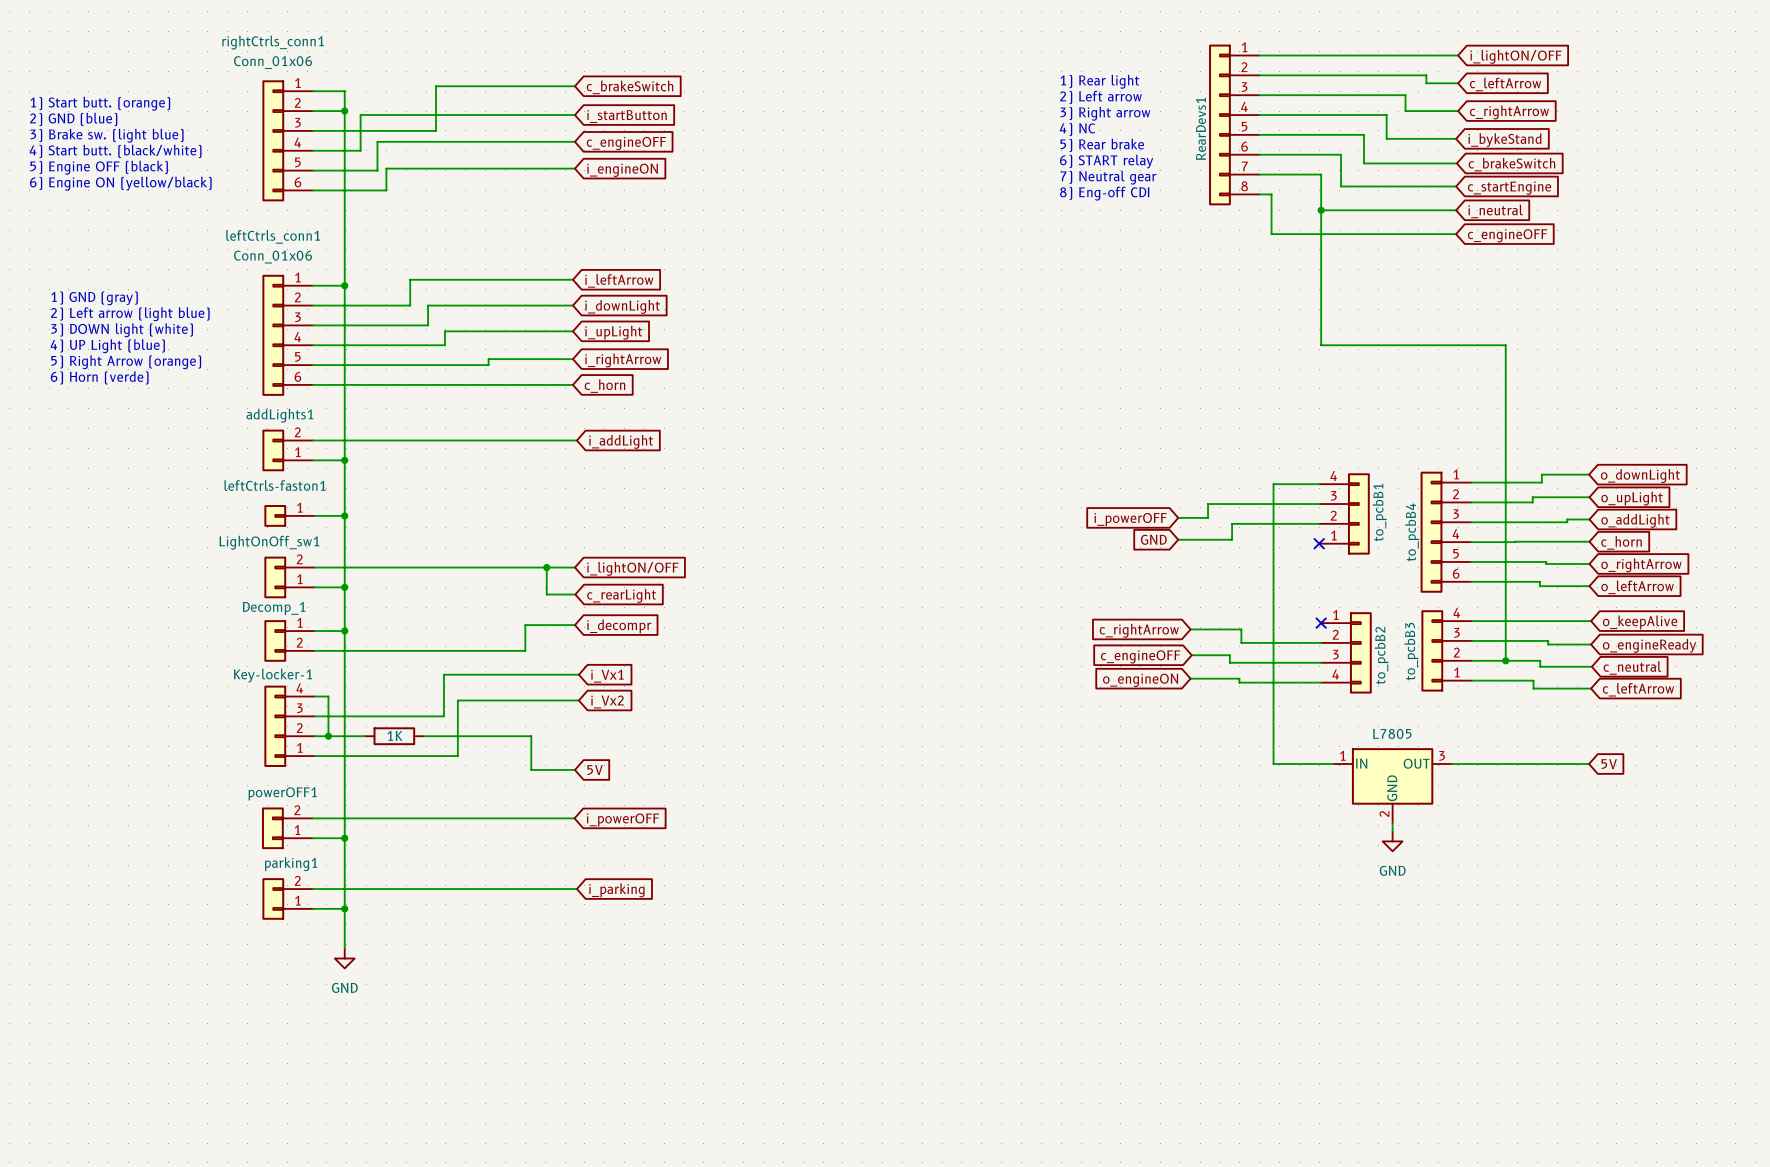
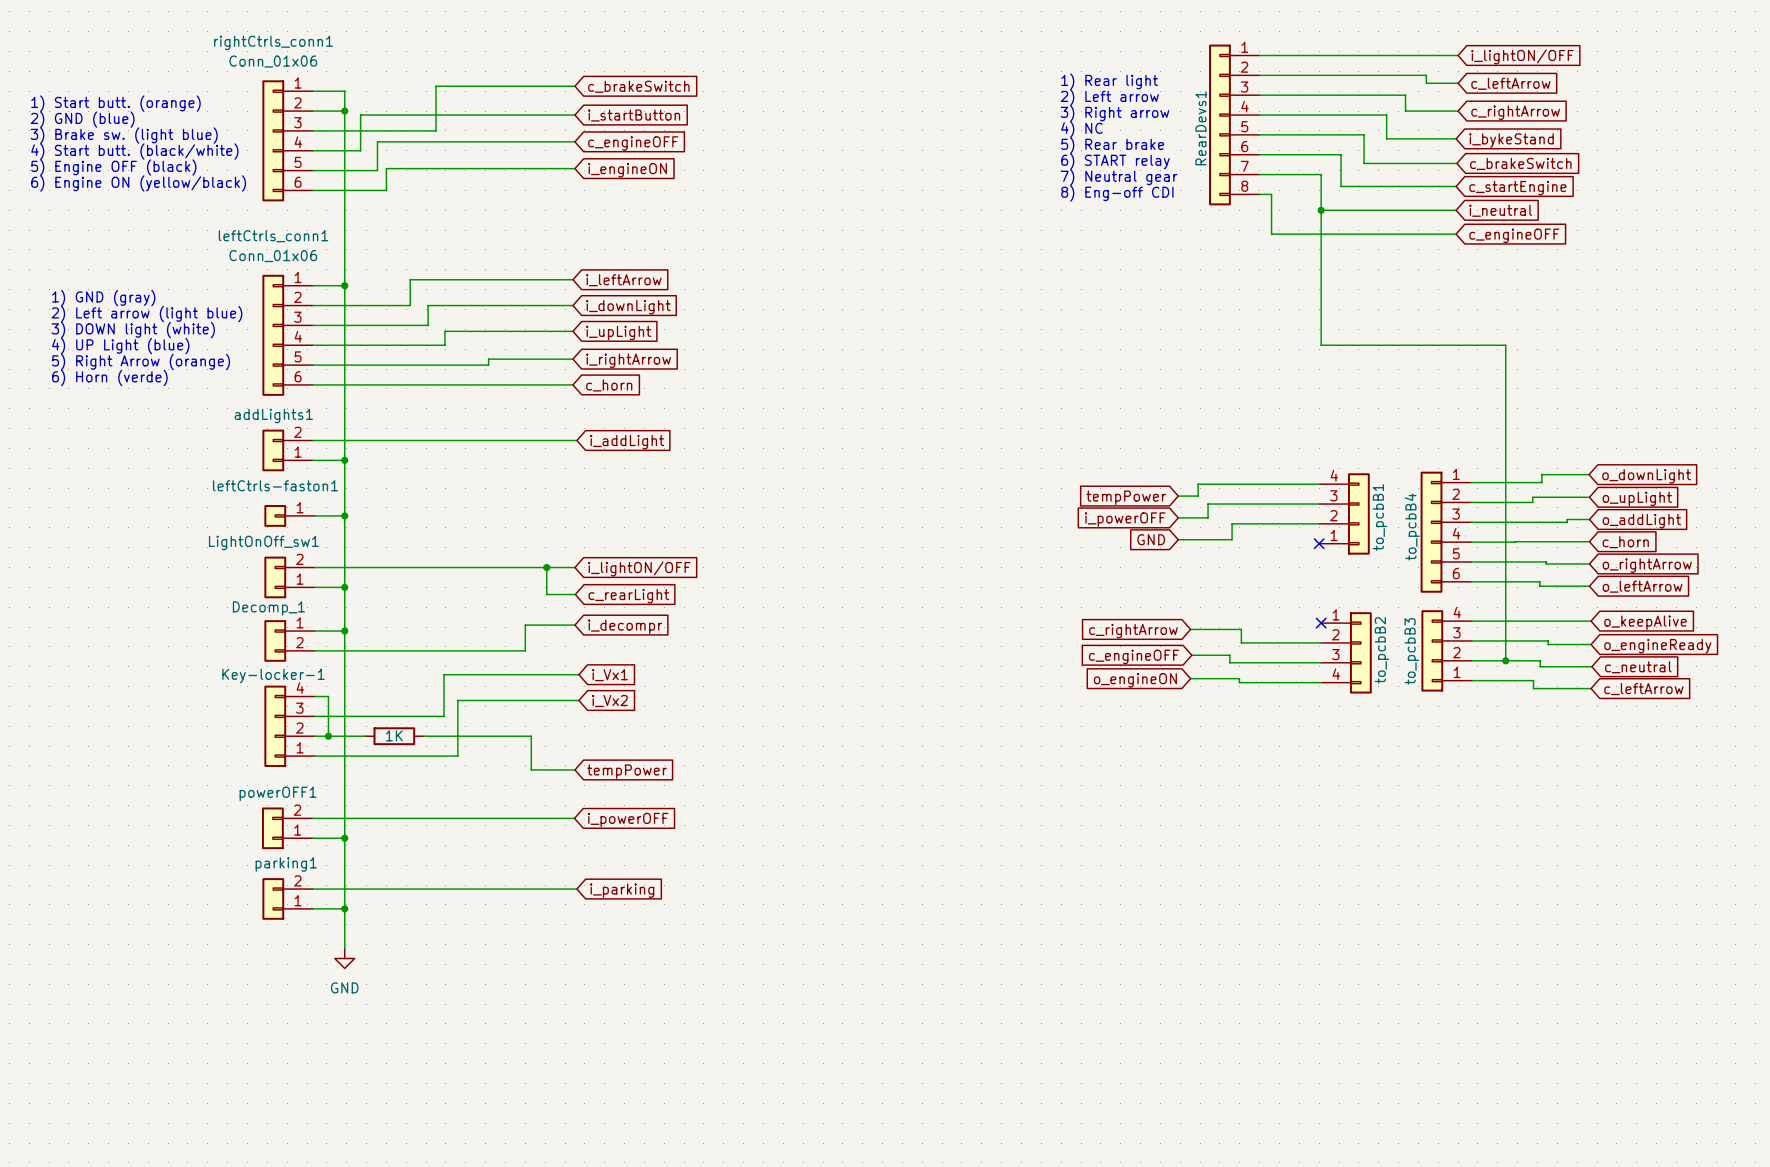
wire: (1273, 484) (1273, 764) (1333, 764) -> (1273, 484) (1198, 484) (1198, 496) (1178, 496)
global label: none -> tempPower (1126, 497)
wire: (1452, 764) (1589, 764) -> none
global label: 5V (1609, 764) -> none
global label: 5V (595, 770) -> tempPower (627, 771)
part: L7805 (1392, 785) -> none
wire: (1392, 823) (1392, 831) -> none
power symbol: GND (1392, 841) -> none

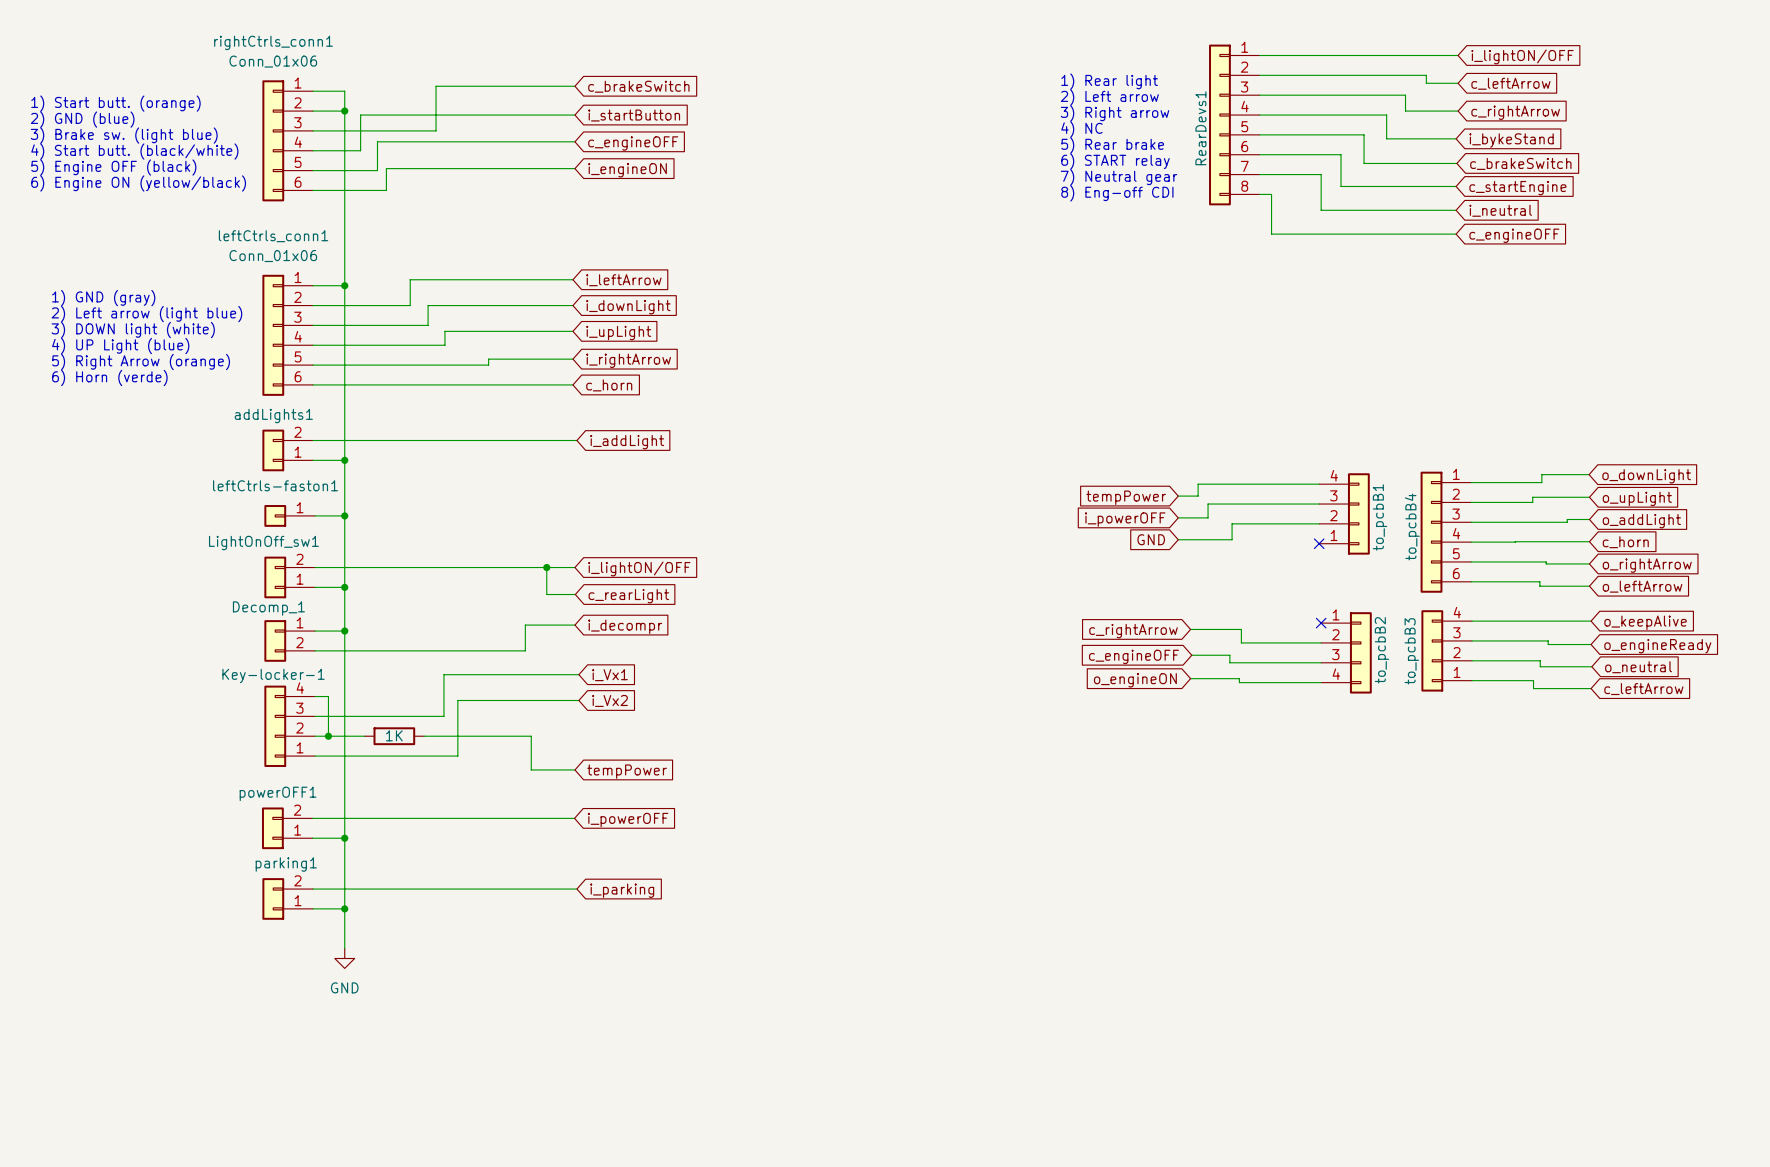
wire: (1321, 210) (1321, 345) (1505, 345) (1505, 660) -> none
junction: (1321, 210) -> none
junction: (1505, 660) -> none
global label: c_neutral (1638, 667) -> o_neutral (1638, 667)

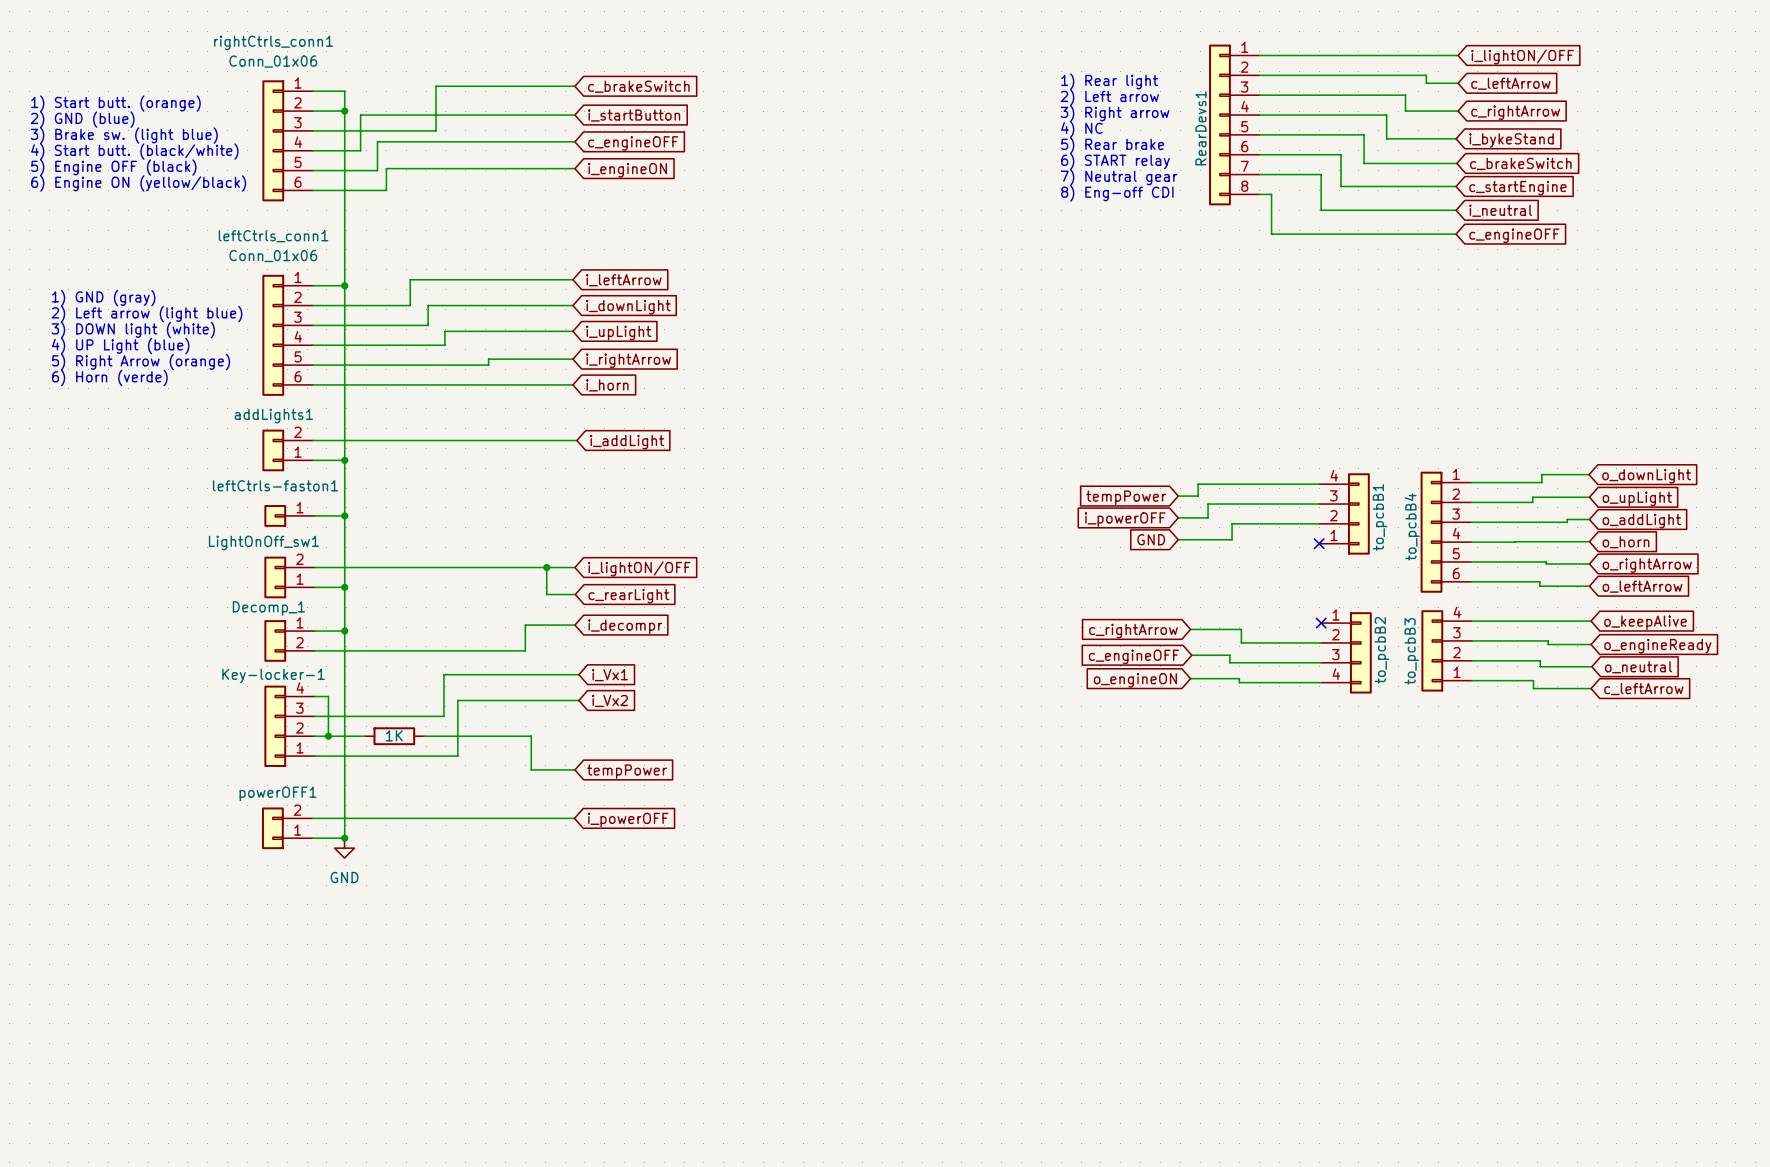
global label: c_horn (609, 385) -> i_horn (607, 385)
global label: c_horn (1625, 542) -> o_horn (1626, 542)
wire: (344, 838) (344, 948) -> none
wire: (312, 889) (576, 889) -> none
global label: i_parking (622, 890) -> none
parking1: (287, 898) -> none
wire: (312, 908) (344, 908) -> none
junction: (344, 908) -> none
power symbol position: GND (344, 958) -> GND (344, 848)

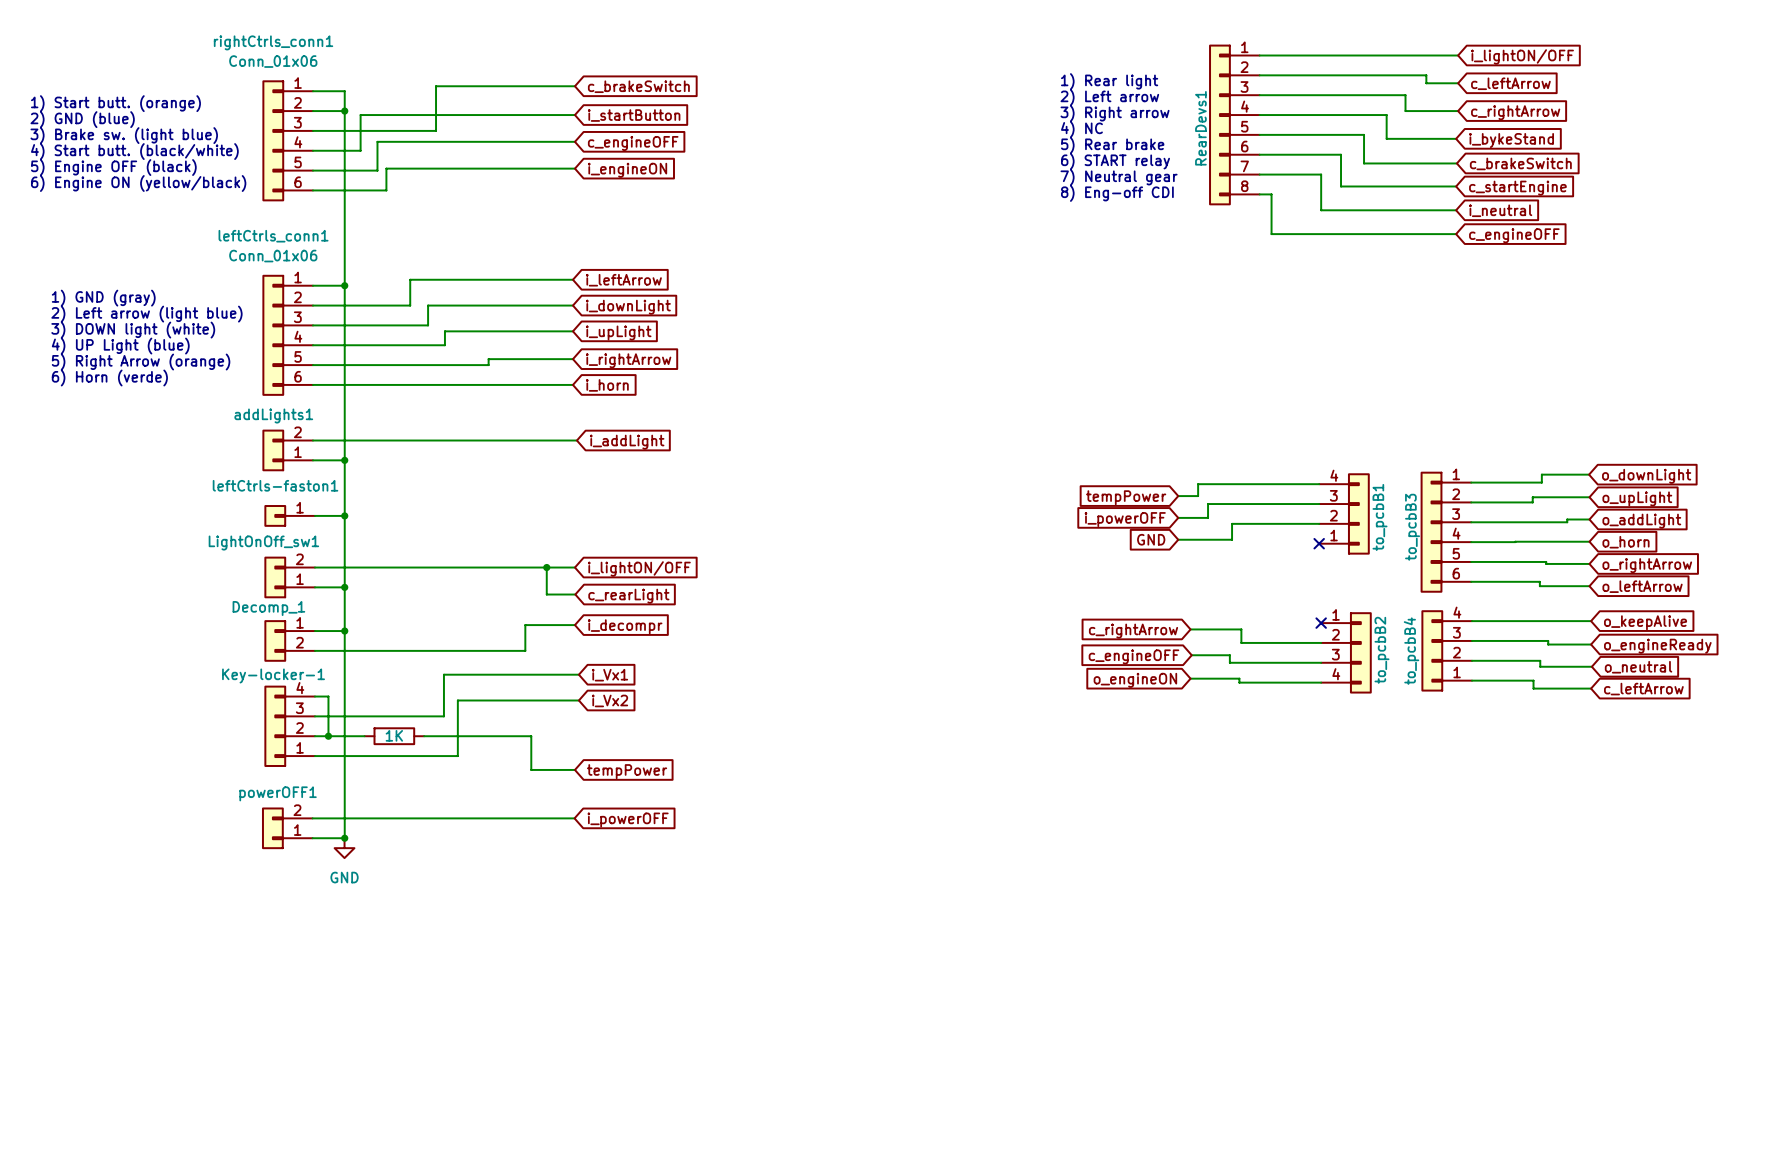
to_pcbB4 name: to_pcbB4 (1412, 527) -> to_pcbB3 (1412, 527)
to_pcbB3 name: to_pcbB3 (1411, 651) -> to_pcbB4 (1411, 651)

